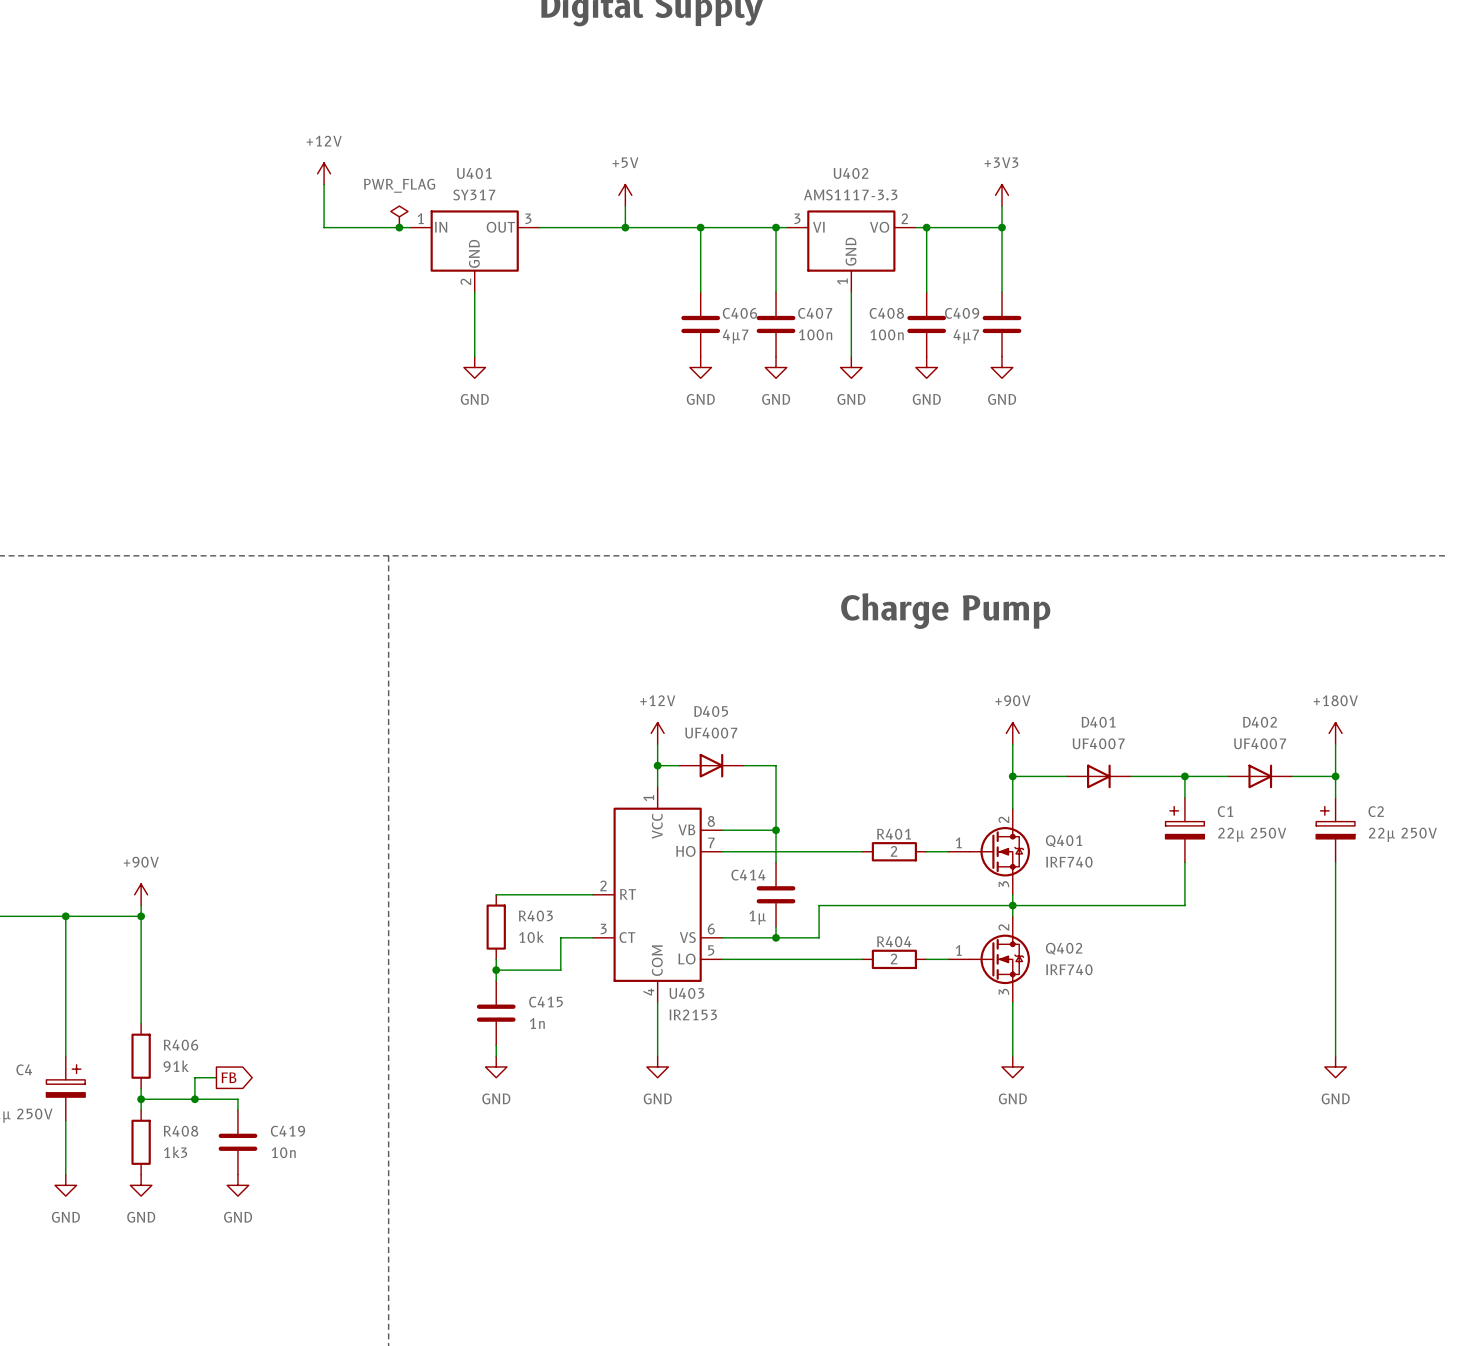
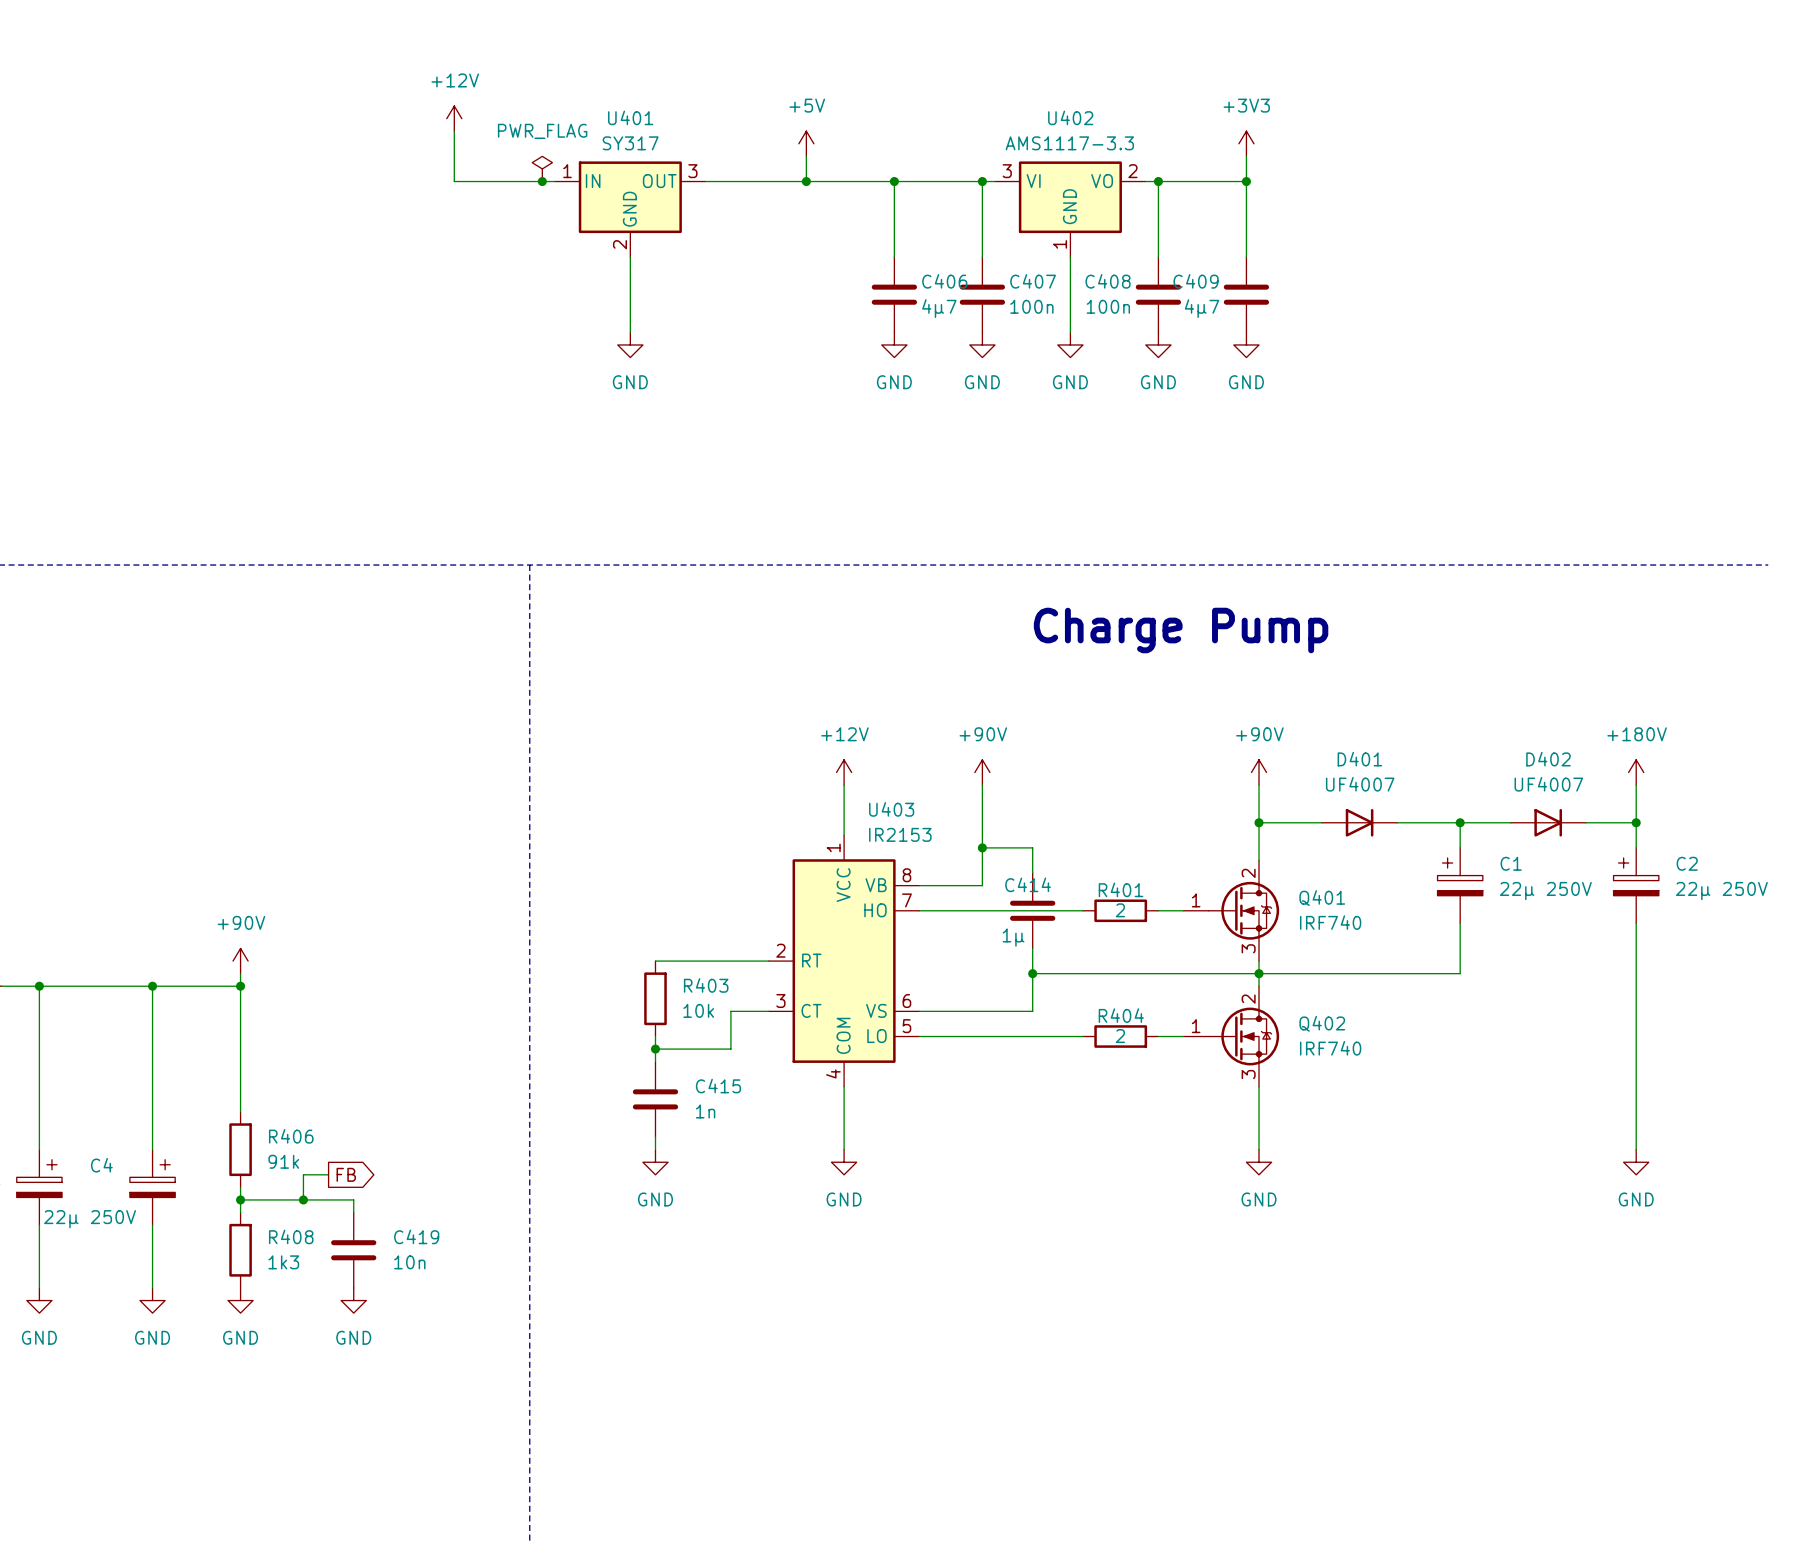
power symbol: none -> +90V (982, 772)
wire: (657, 765) (679, 765) -> none
junction: (657, 765) -> none
D405: UF4007 (711, 765) -> none
wire: (743, 765) (776, 765) -> (982, 785) (982, 810)
wire: none -> (982, 847) (1032, 847) (1032, 873)
wire: (776, 830) (776, 862) -> none
junction position: (776, 830) -> (982, 847)
C414 name position: C414 (748, 875) -> C414 (1028, 884)
wire: none -> (1032, 948) (1032, 973)
C414 position: (776, 894) -> (1032, 910)
junction: none -> (1032, 973)
wire: (776, 927) (776, 937) -> none
junction: (776, 937) -> none
U403 name position: U403 (686, 993) -> U403 (891, 809)
U403 value position: IR2153 (693, 1014) -> IR2153 (900, 834)

